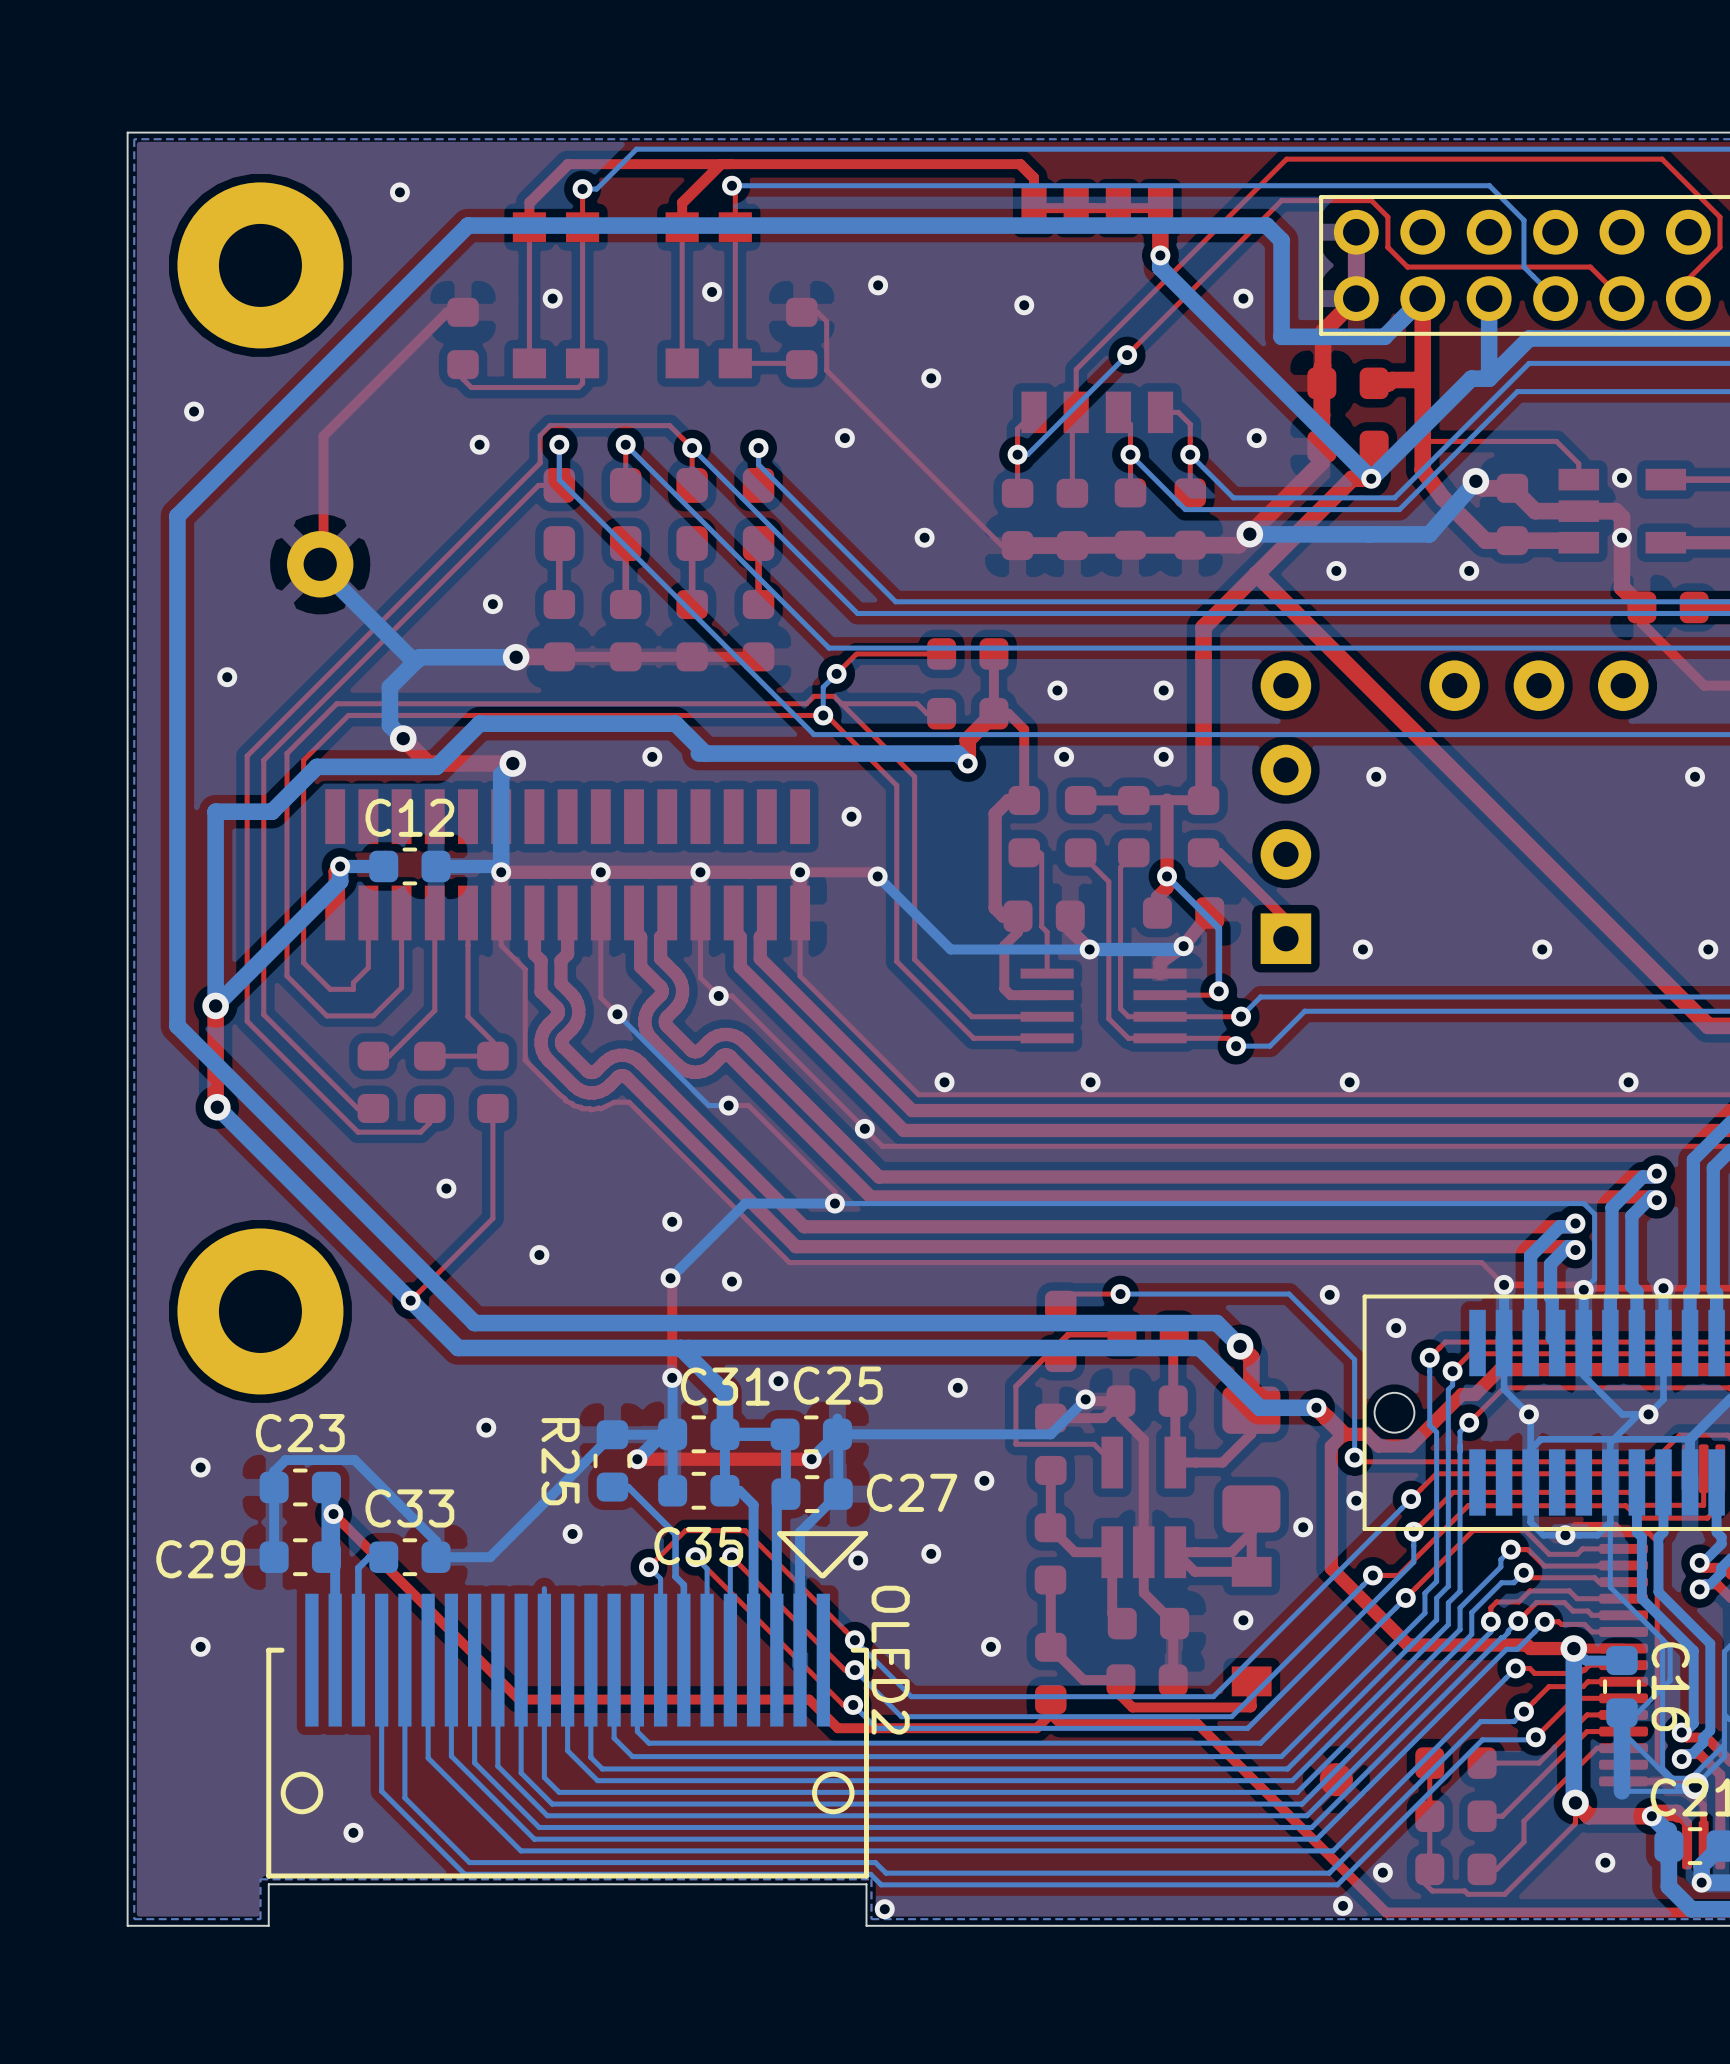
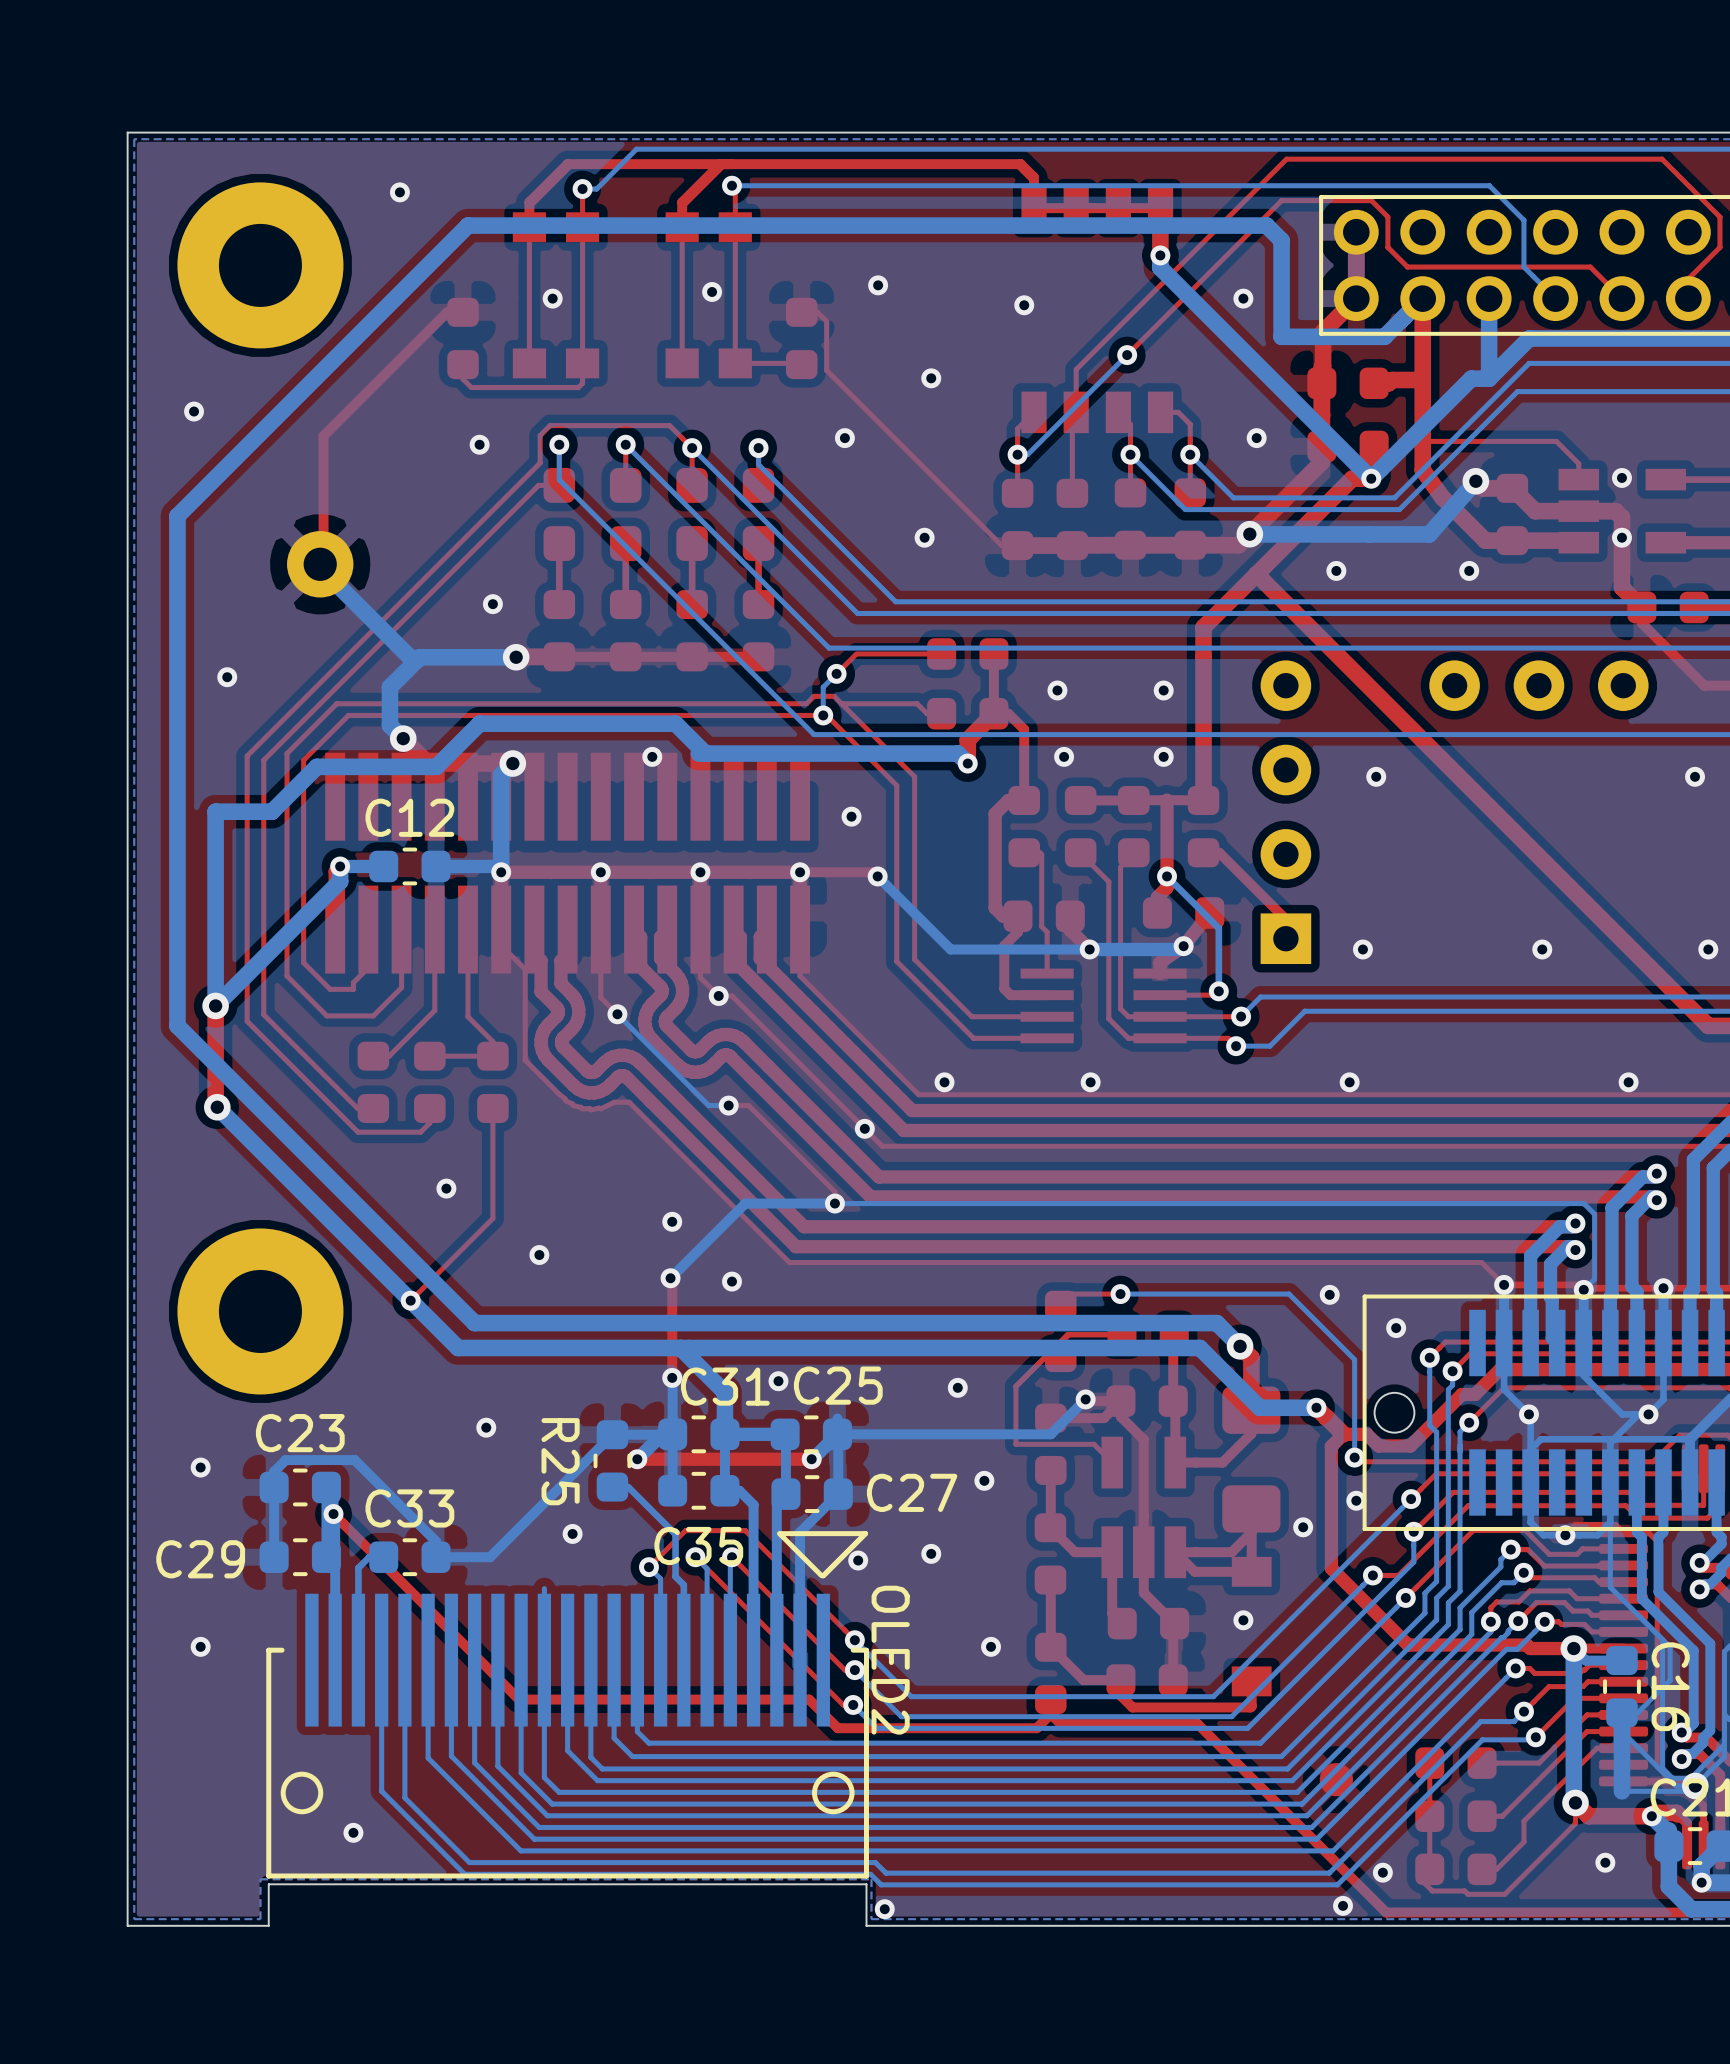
part footprint: [325, 789, 811, 941] -> [325, 752, 811, 974]

